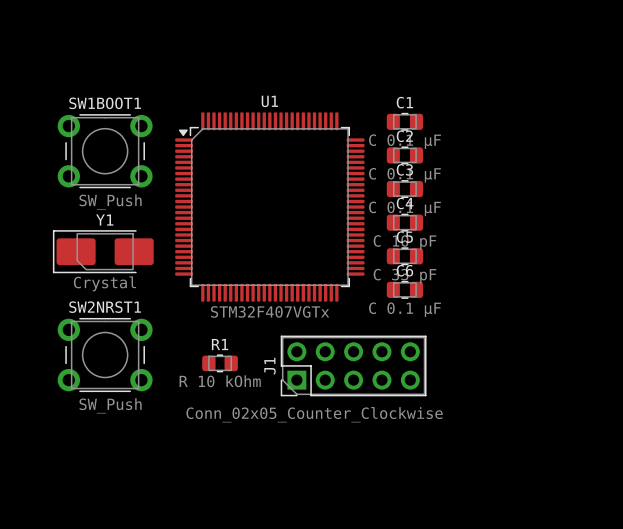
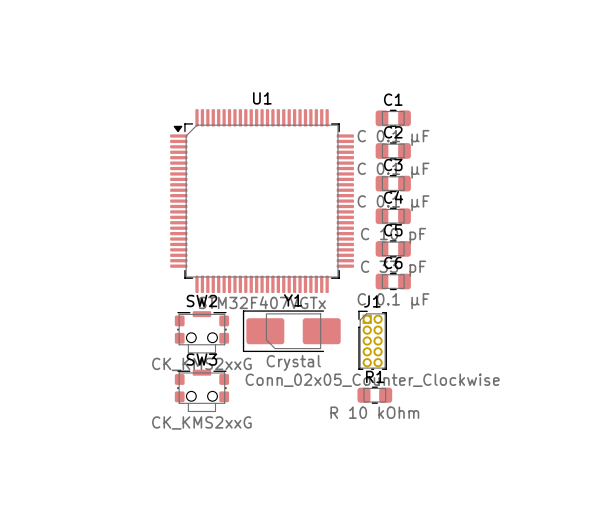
SW1BOOT1: SW_Push (105, 151) -> none
Y1 position: (103, 251) -> (291, 331)
J1 footprint: [280, 335, 427, 397] -> [358, 310, 387, 370]
SW2: none -> CK_KMS2xxG (201, 332)
SW2NRST1: SW_Push (105, 355) -> none
R1 position: (220, 363) -> (374, 395)
J1 name position: J1 (269, 366) -> J1 (372, 301)
SW3: none -> CK_KMS2xxG (201, 390)
J1 value position: Conn_02x05_Counter_Clockwise (314, 414) -> Conn_02x05_Counter_Clockwise (372, 380)

